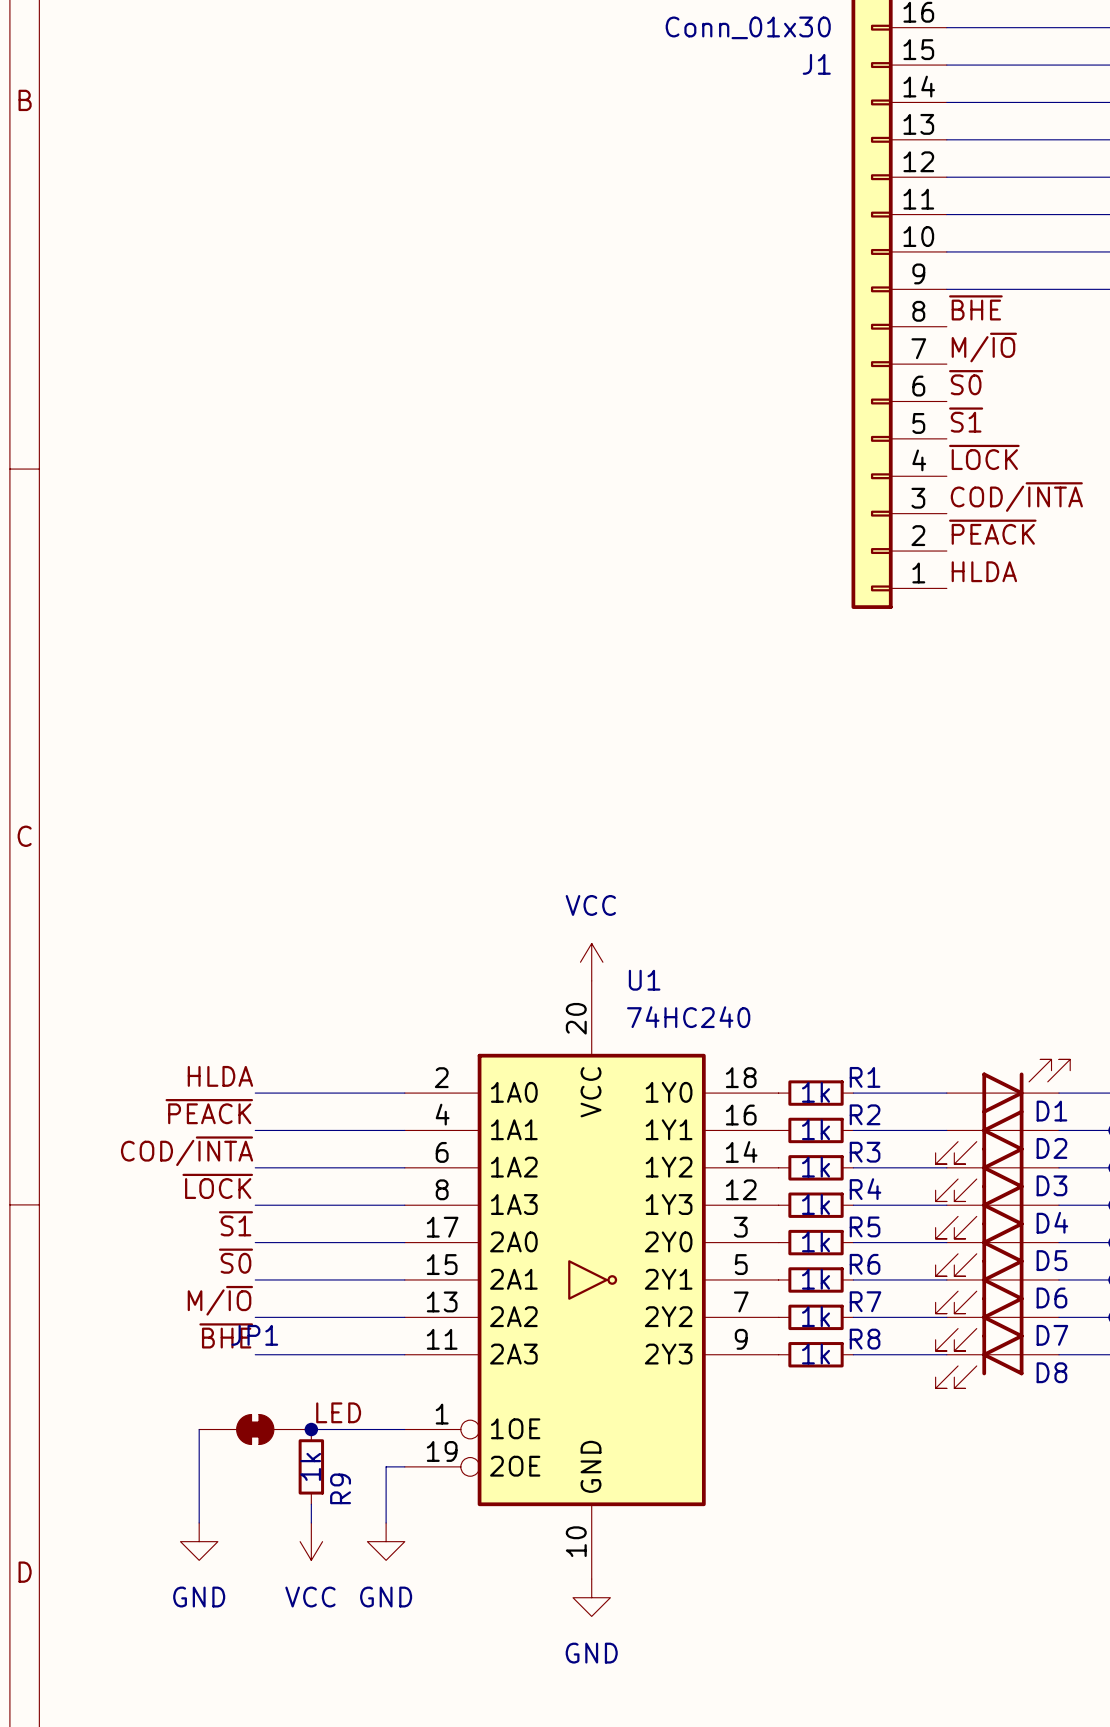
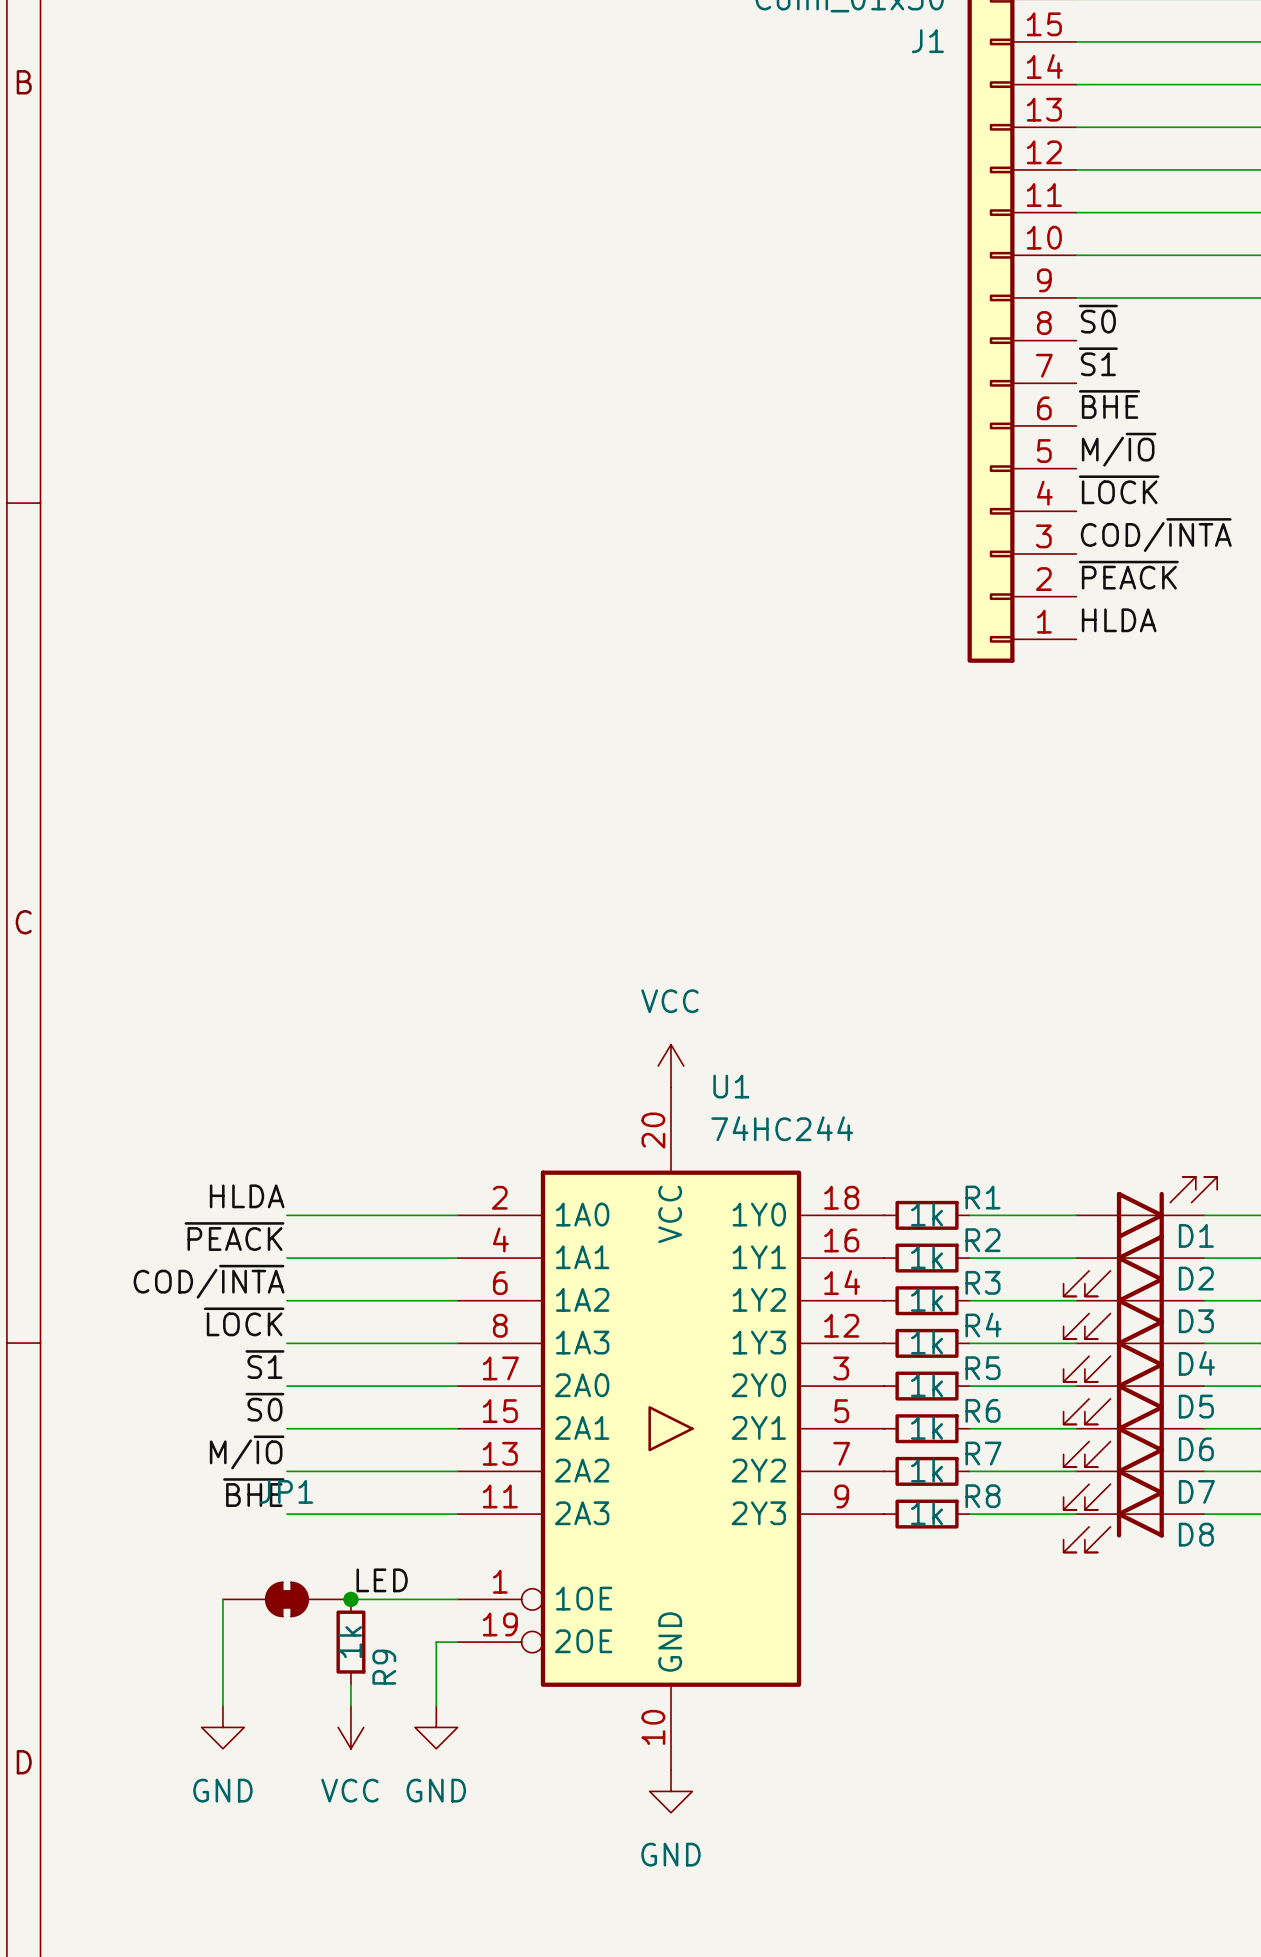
label: ~{BHE} (975, 307) -> ~{S0} (1098, 319)
label: M/~{IO} (984, 347) -> ~{S1} (1098, 361)
label: ~{S0} (966, 382) -> ~{BHE} (1109, 404)
label: ~{S1} (966, 420) -> M/~{IO} (1119, 449)
U1 symbol: [404, 980, 779, 1580] -> [457, 1087, 885, 1771]
U1 value: 74HC240 (688, 1017) -> 74HC244 (782, 1128)

